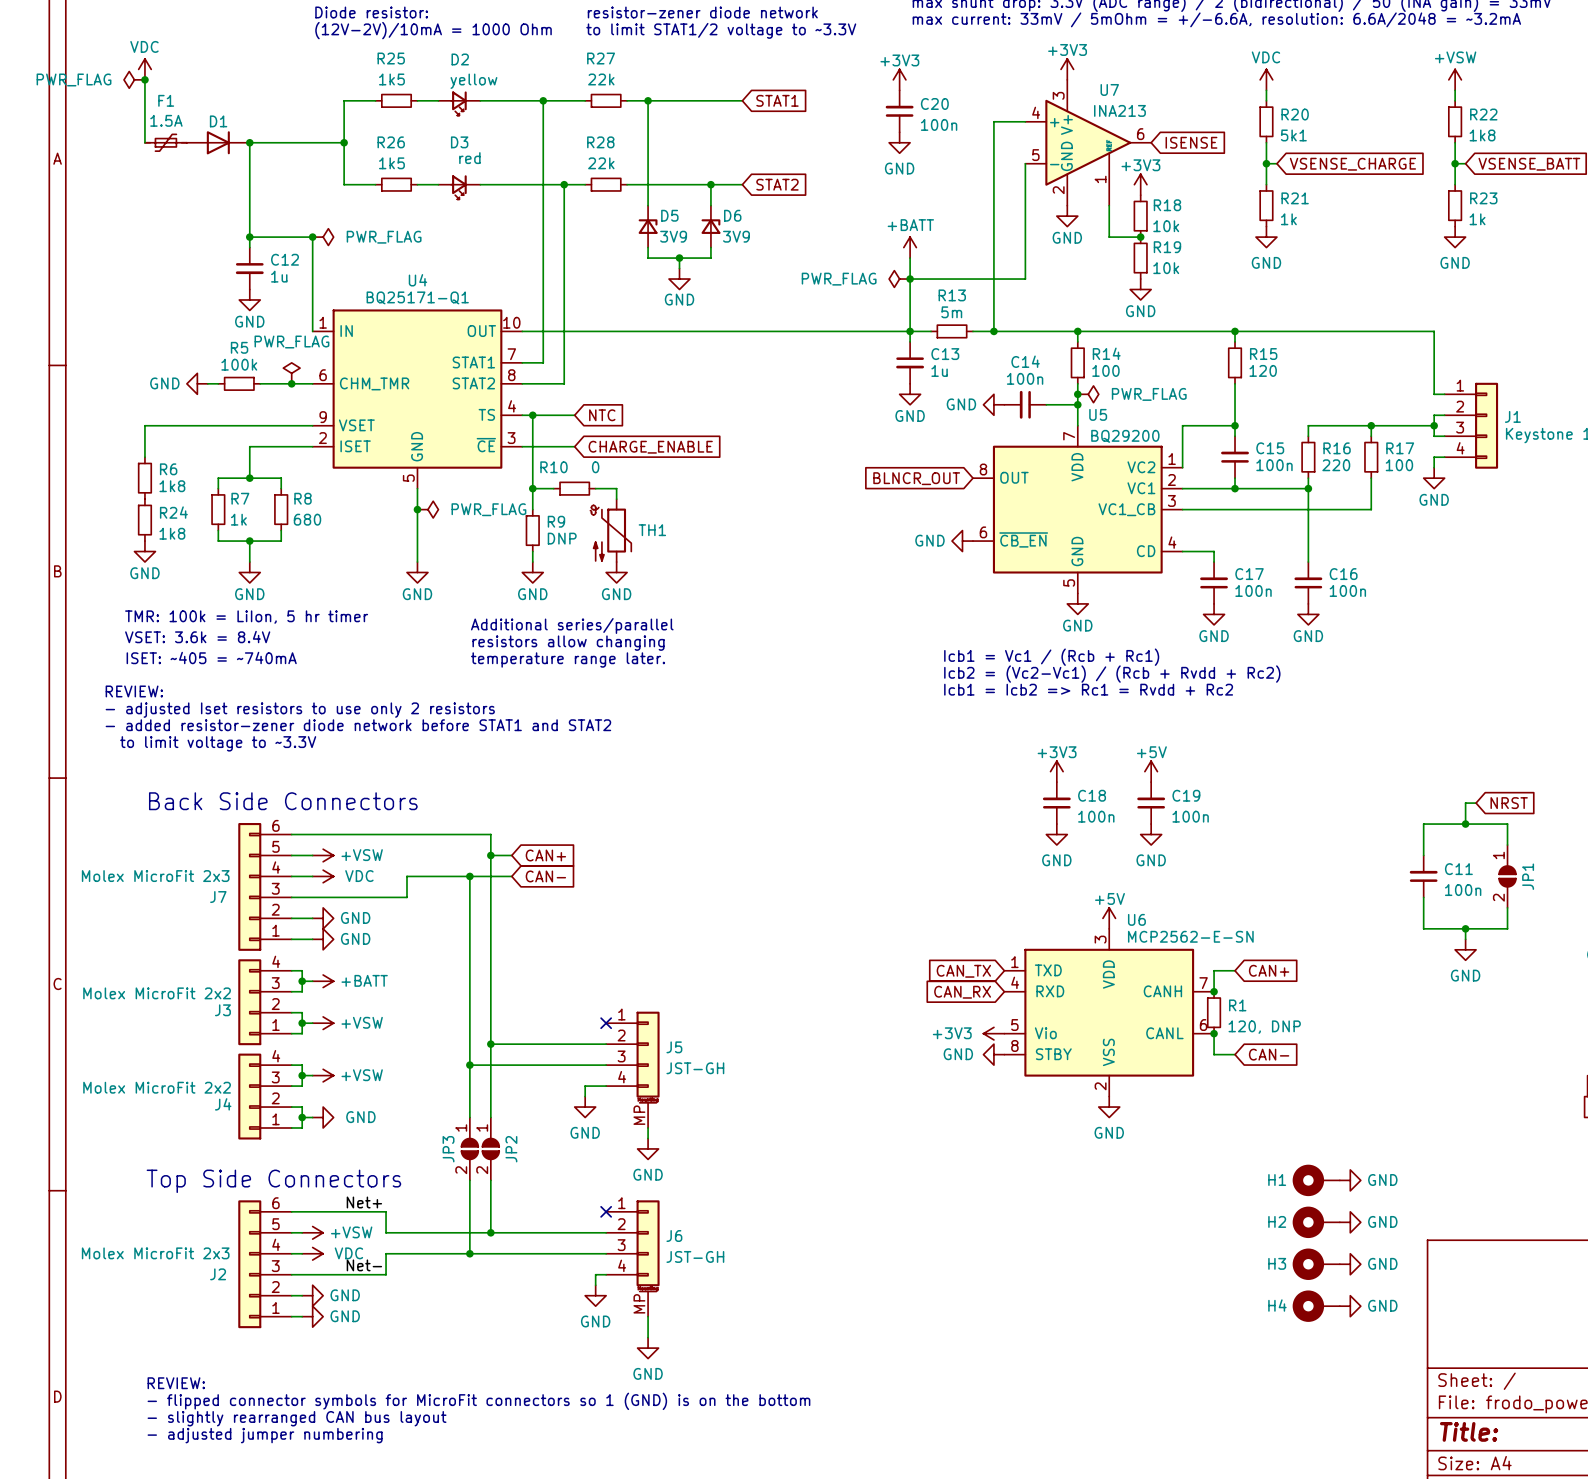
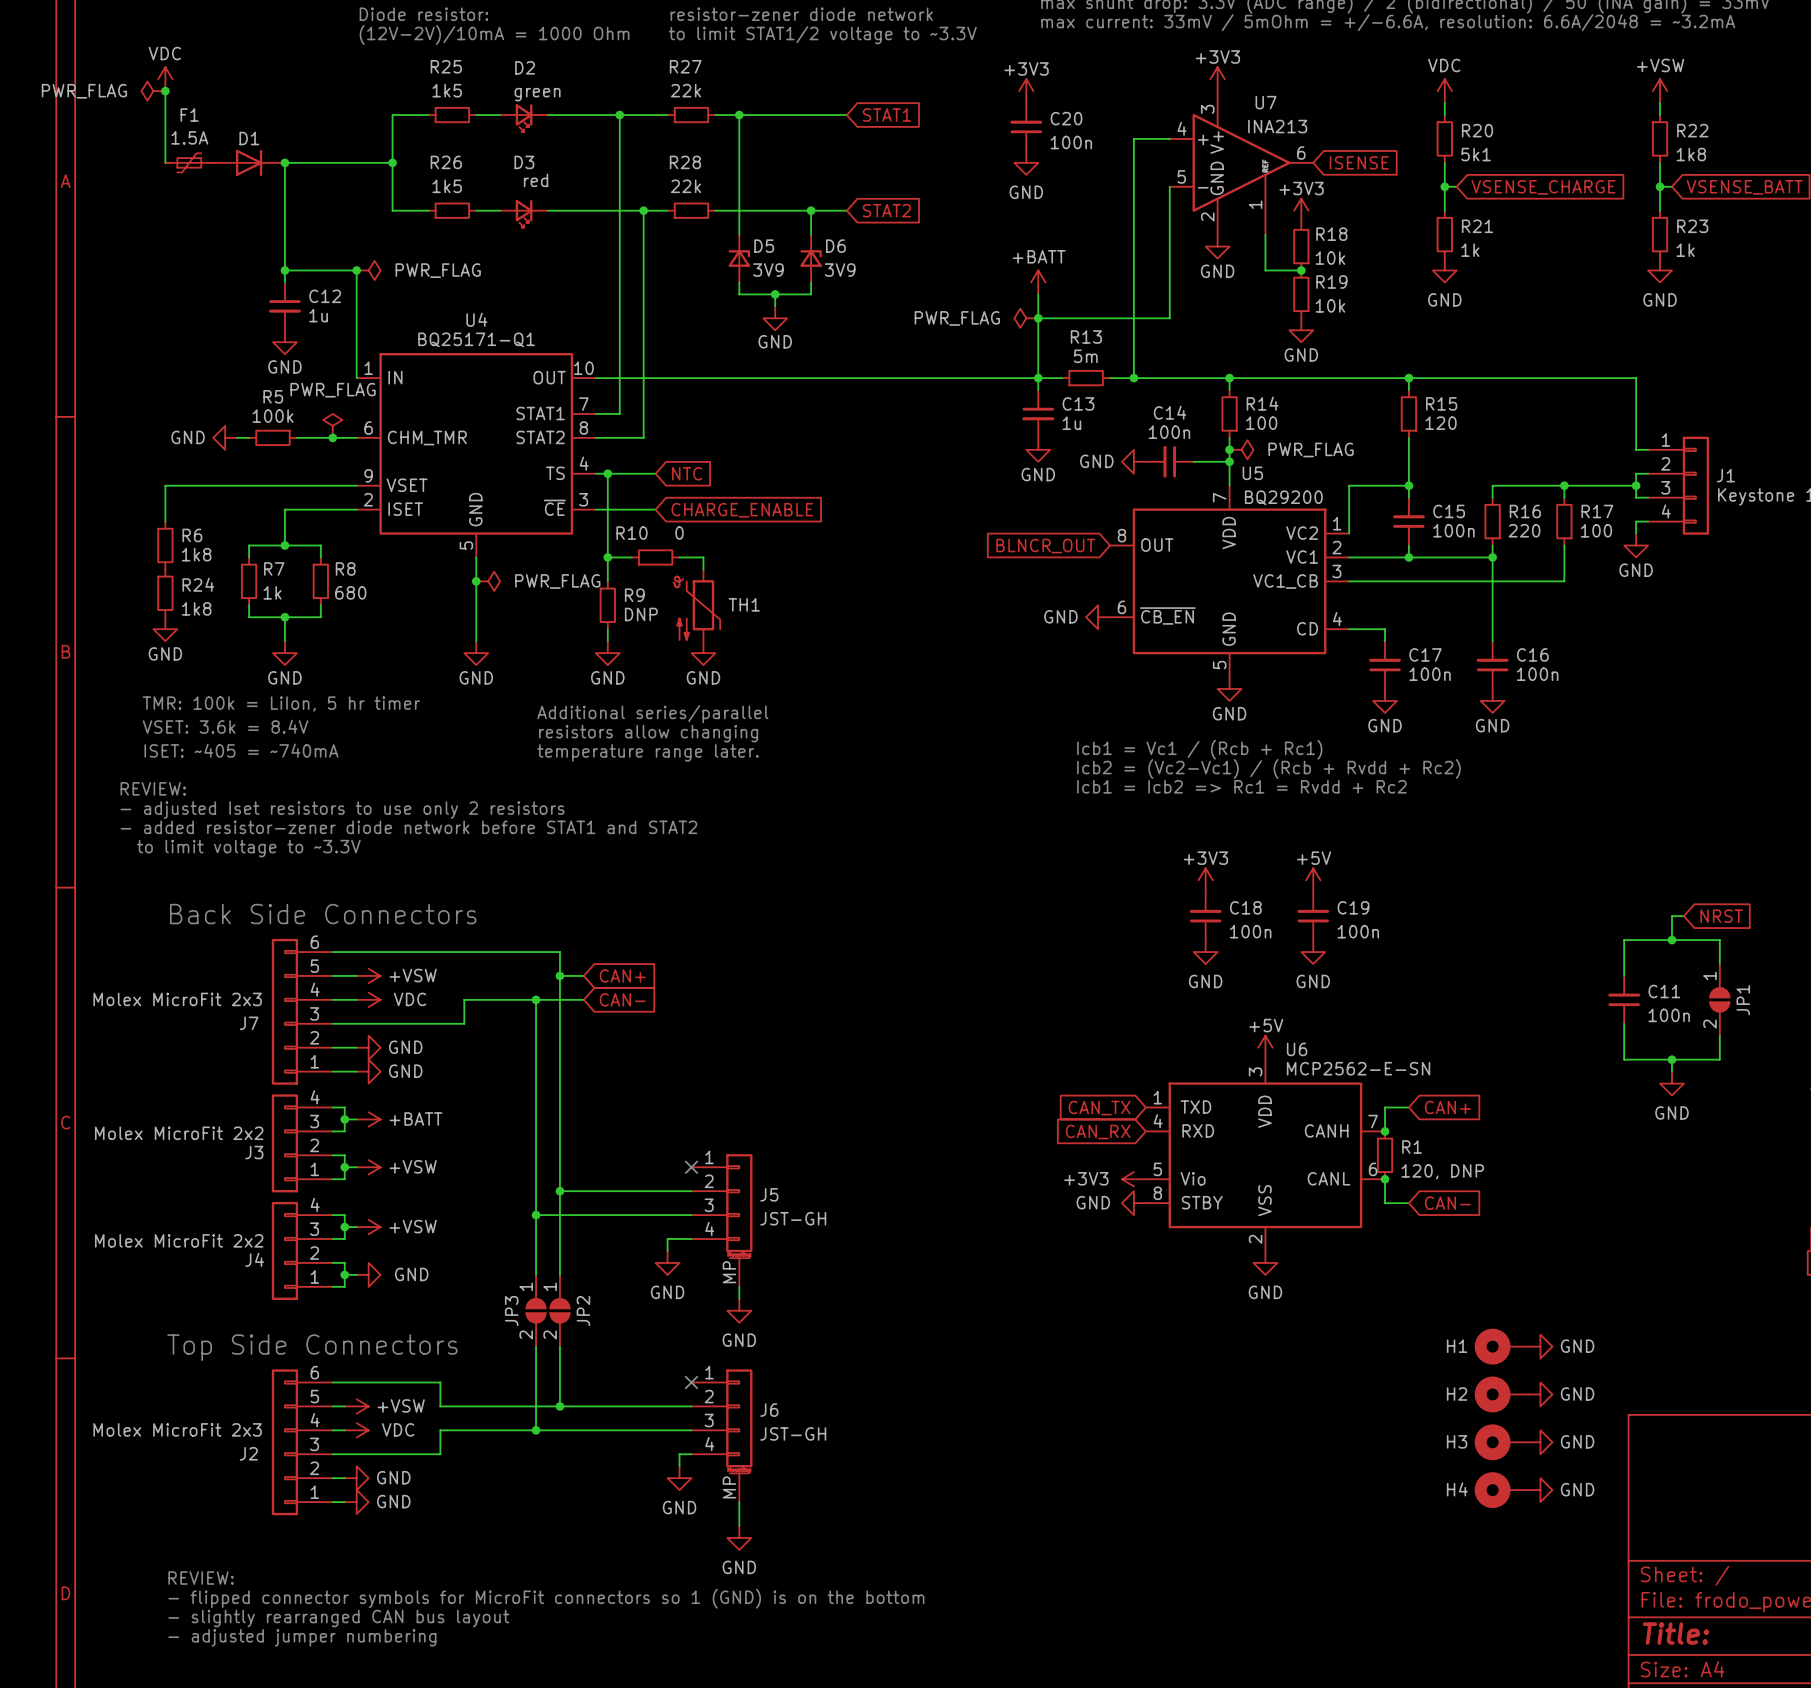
D2 value: yellow (473, 81) -> green (537, 94)
label: Net+ (364, 1202) -> none
label: Net- (364, 1265) -> none

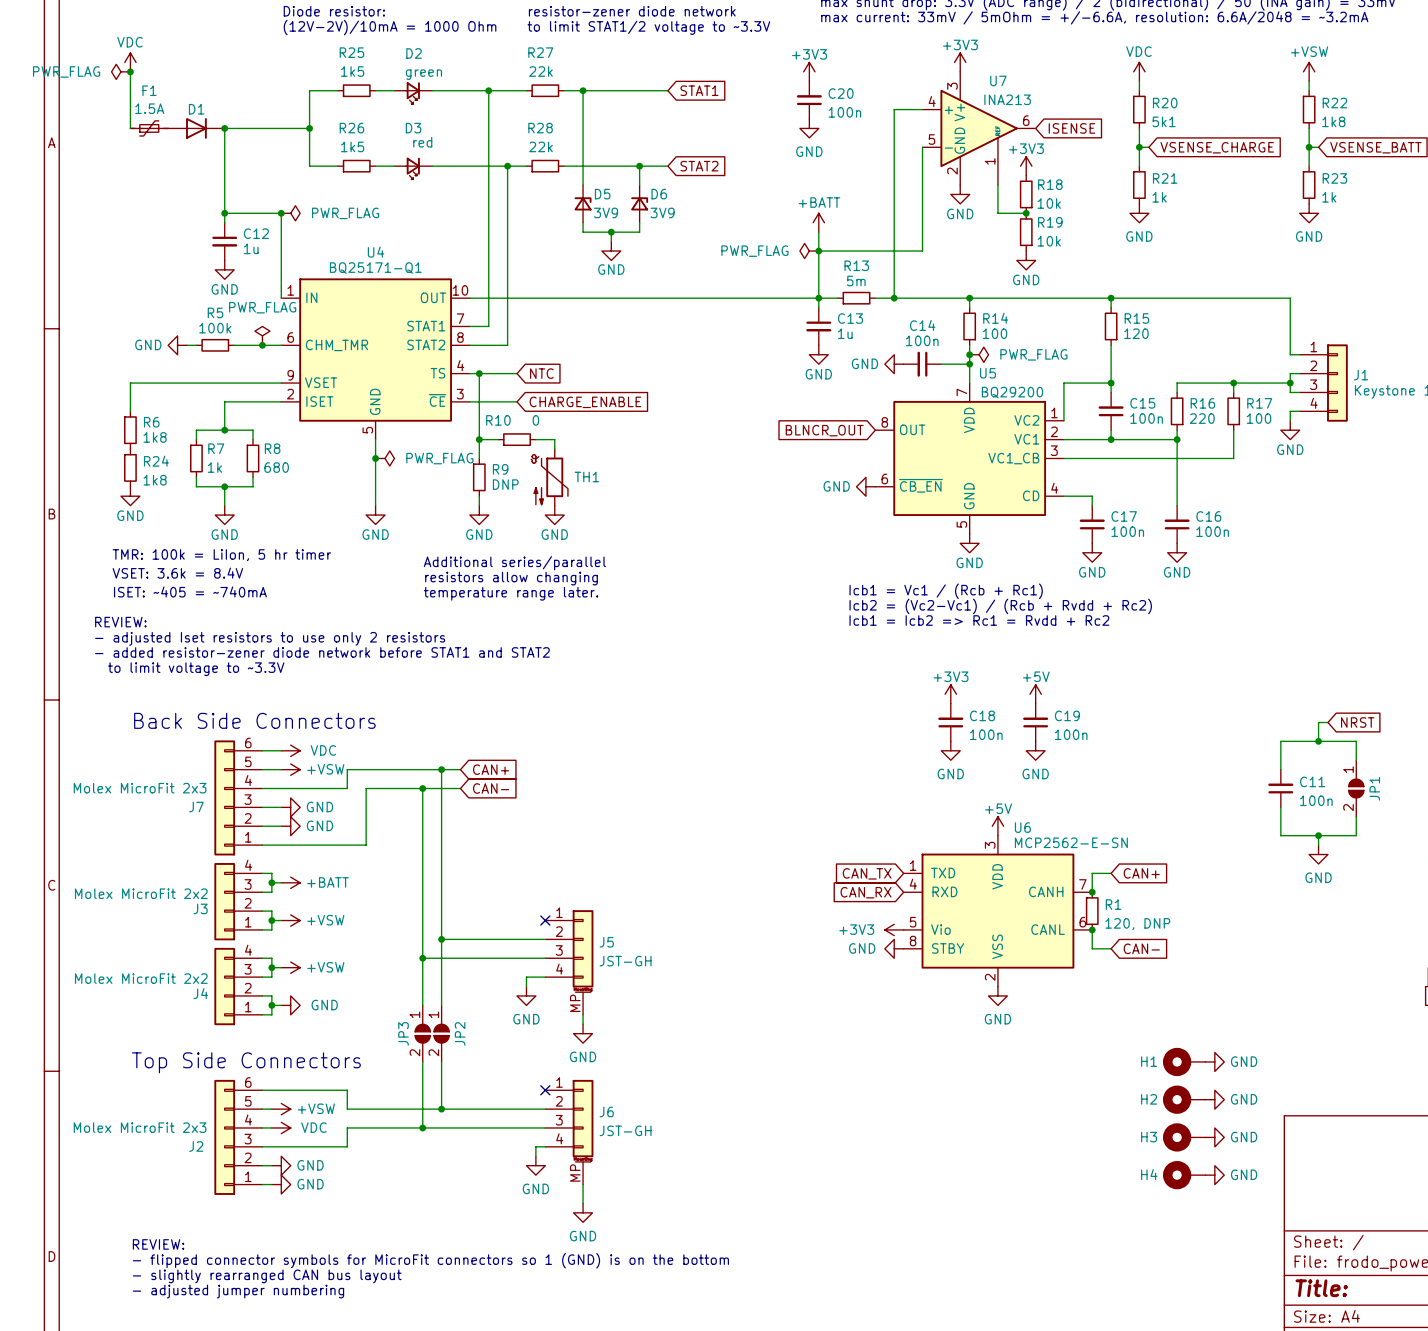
wire: (356, 952) (559, 952) (559, 975) -> (281, 788) (347, 788) (347, 769) (441, 769)
power symbol position: VDC (368, 999) -> VDC (290, 750)
wire: (356, 1023) (464, 1023) -> (281, 845) (366, 845) (366, 807)
power symbol position: GND (368, 1071) -> GND (290, 807)

